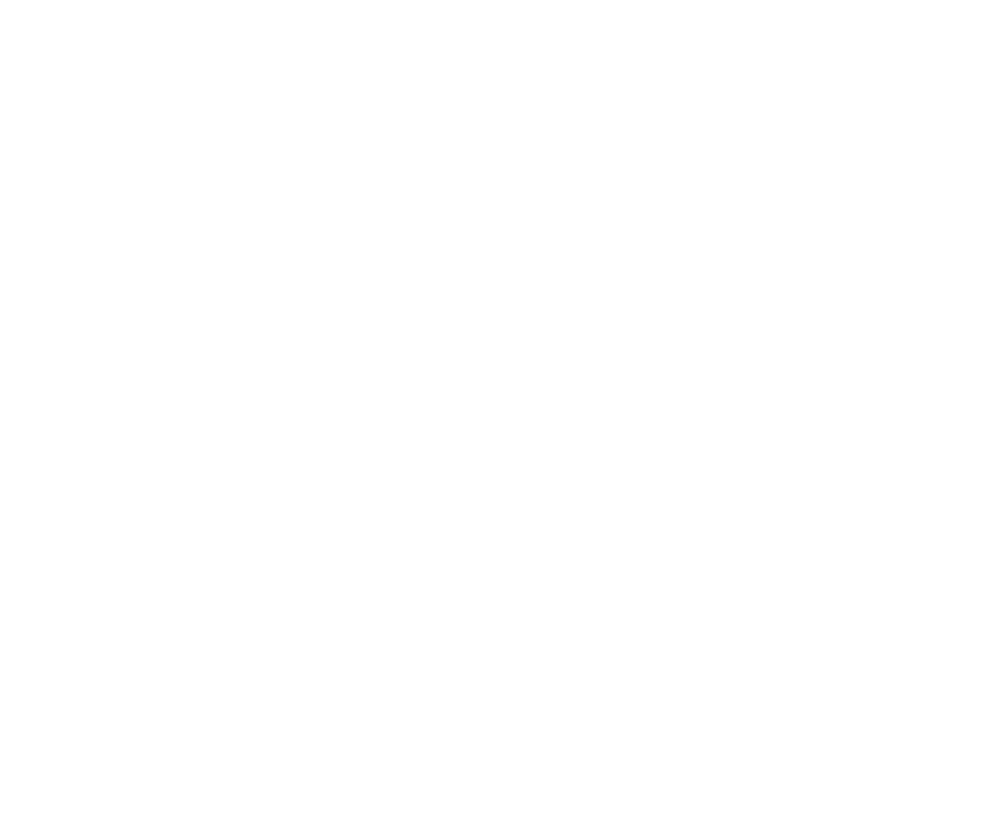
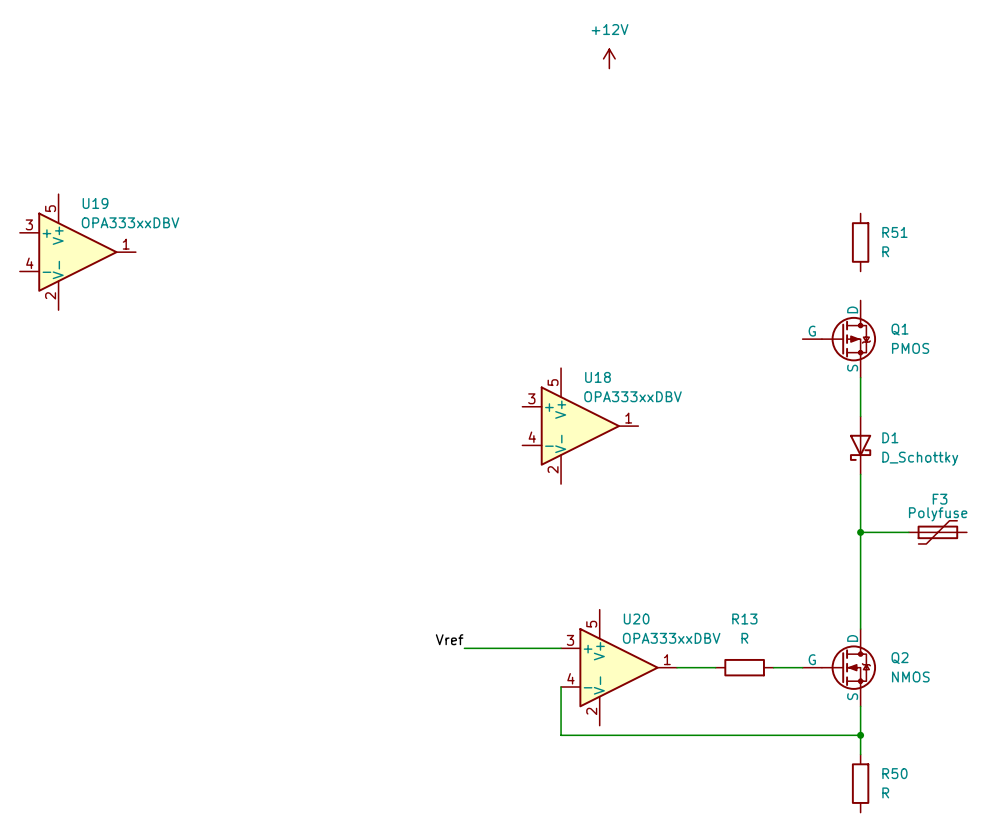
power symbol: none -> +12V (609, 58)
R51: none -> R (860, 242)
U19: none -> OPA333xxDBV (77, 252)
Q1: none -> PMOS (839, 339)
wire: none -> (860, 377) (860, 416)
U18: none -> OPA333xxDBV (580, 426)
D1: none -> D_Schottky (860, 445)
wire: none -> (860, 474) (860, 629)
wire: none -> (860, 532) (908, 532)
junction: none -> (860, 532)
F3: none -> Polyfuse (937, 532)
label: none -> Vref (449, 639)
wire: none -> (464, 648) (561, 648)
U20: none -> OPA333xxDBV (619, 667)
wire: none -> (676, 667) (715, 667)
R13: none -> R (744, 667)
wire: none -> (773, 667) (802, 667)
Q2: none -> NMOS (839, 667)
wire: none -> (561, 687) (561, 735) (860, 735)
wire: none -> (860, 706) (860, 754)
junction: none -> (860, 735)
R50: none -> R (860, 783)

